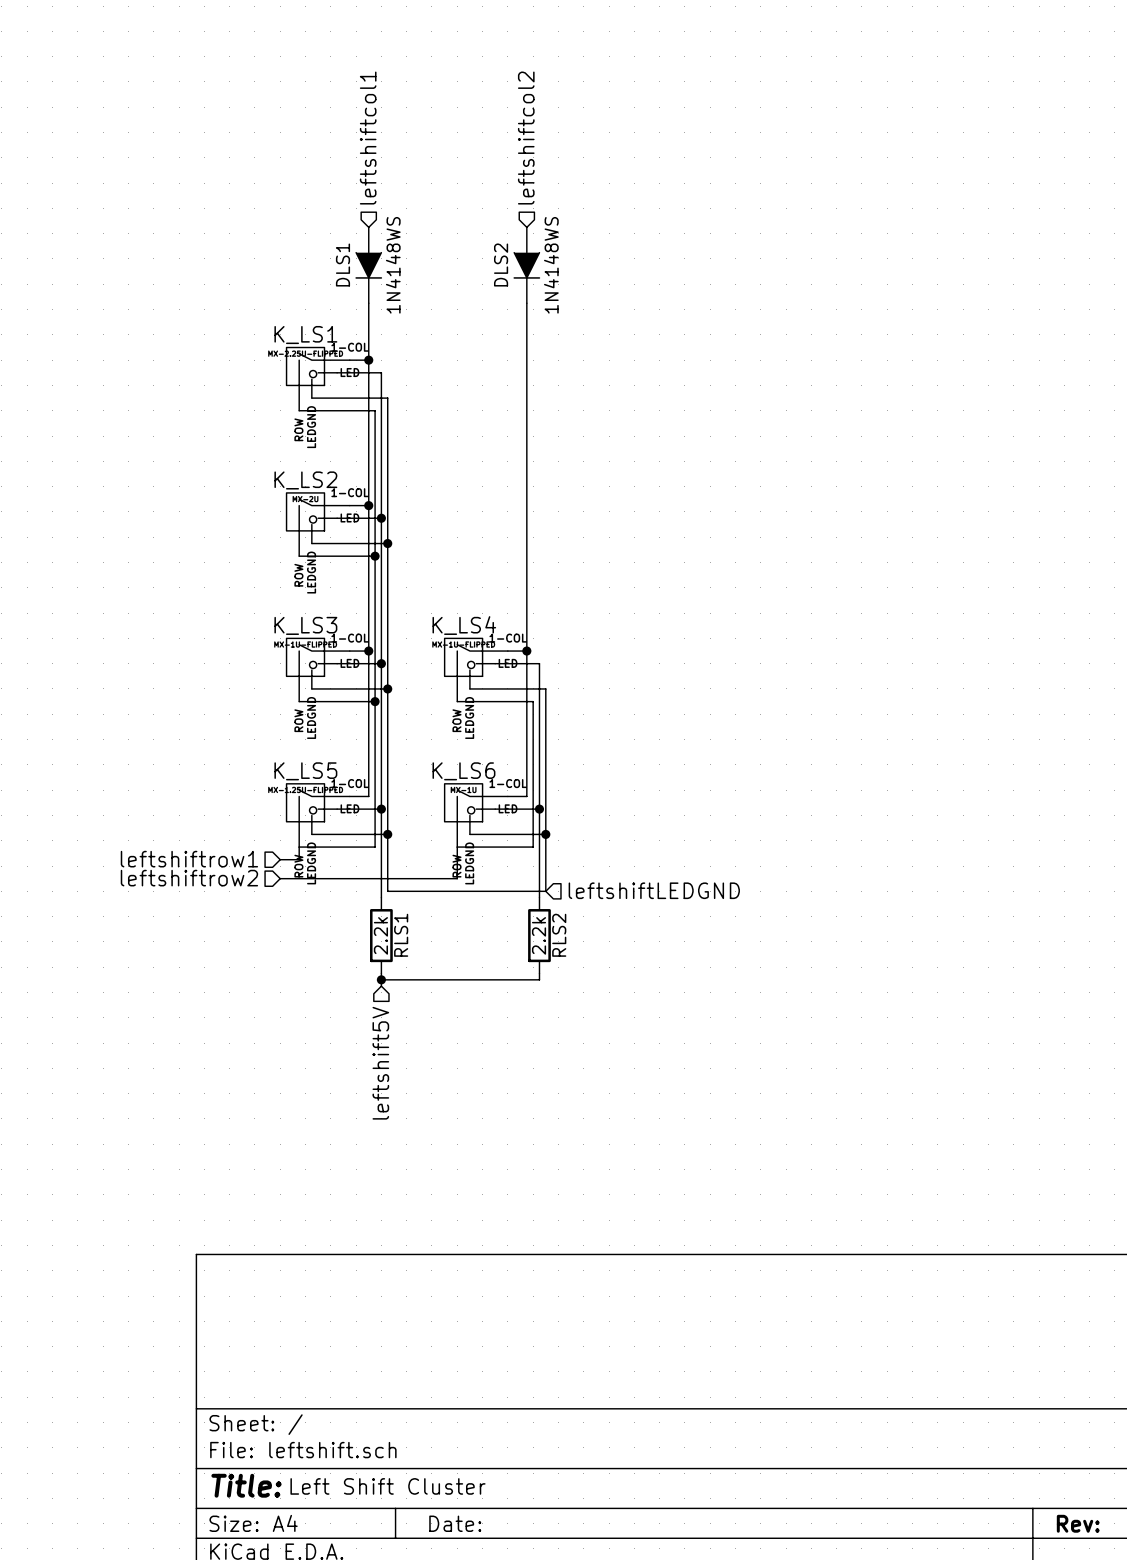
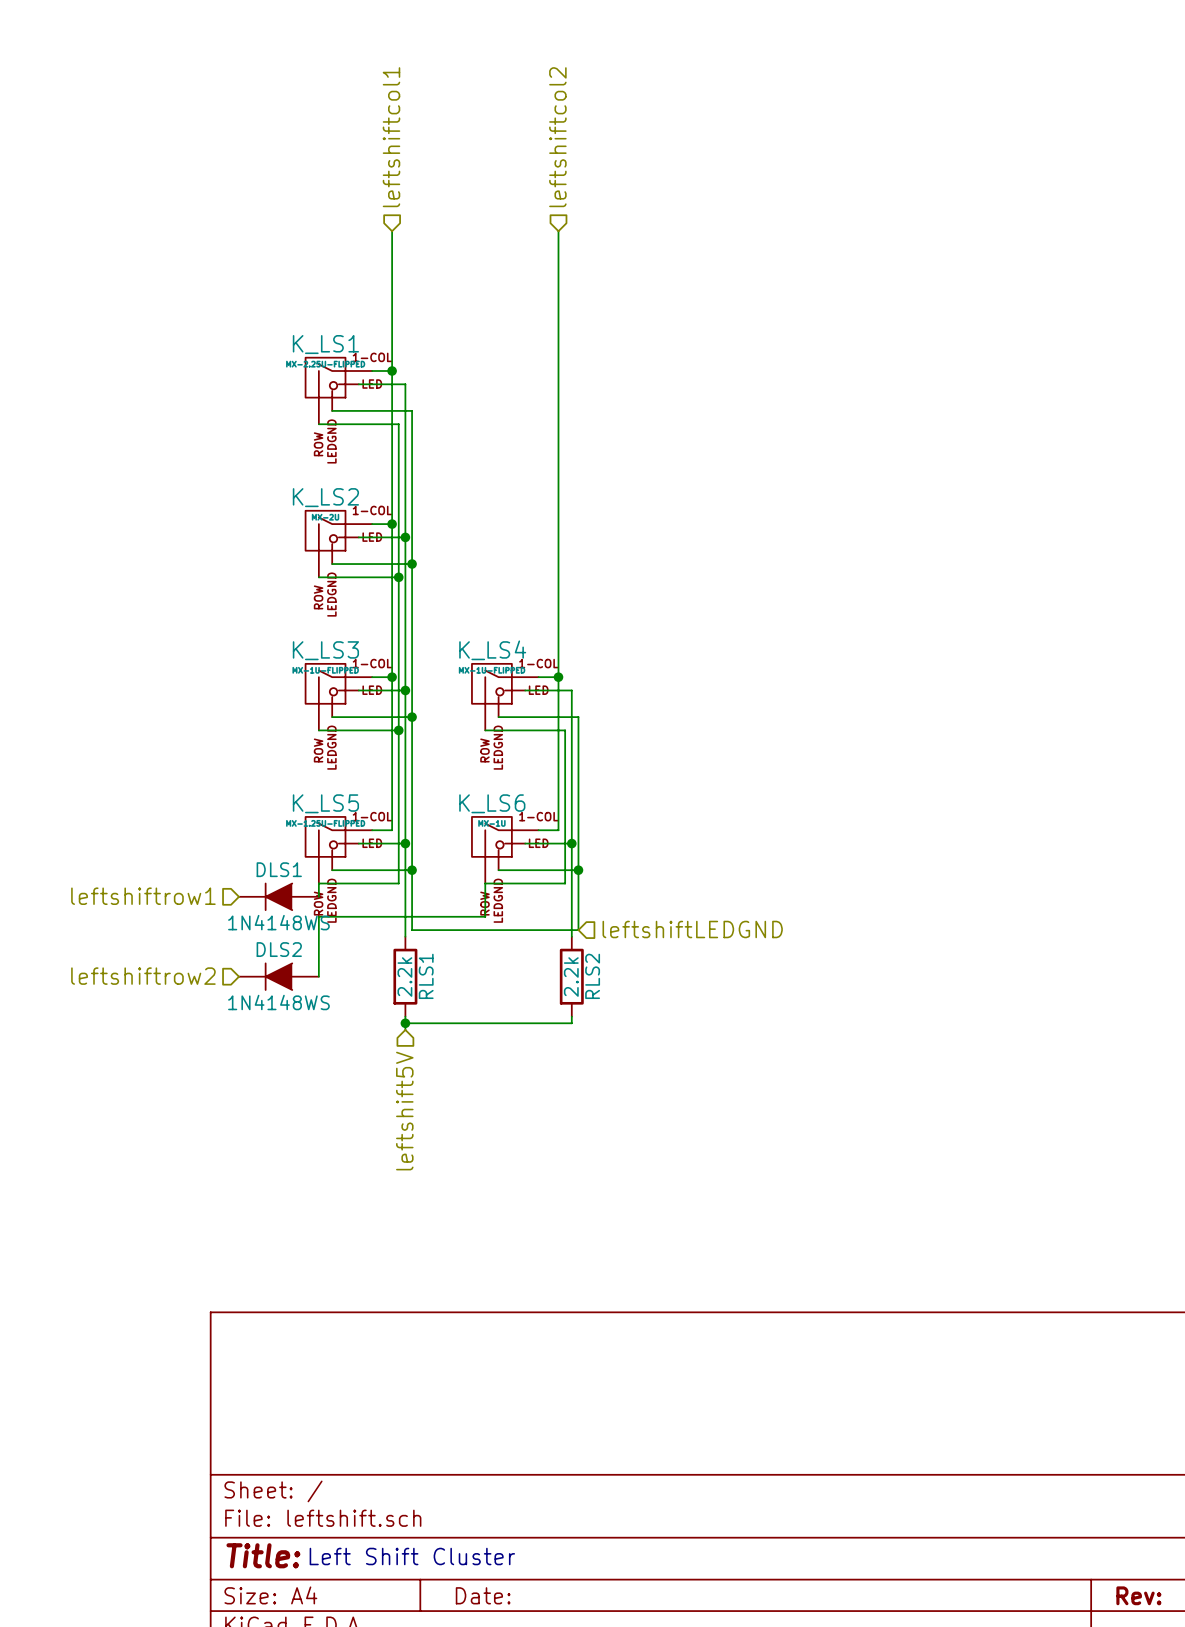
DLS1 rotation: 0° (368, 265) -> 90° clockwise (278, 896)
DLS1 position: (368, 265) -> (278, 896)
DLS2 rotation: 0° (526, 265) -> 90° clockwise (278, 976)
DLS2 position: (526, 265) -> (278, 976)
hierarchical label position: leftshiftrow1 (189, 859) -> leftshiftrow1 (143, 896)
hierarchical label position: leftshiftrow2 (189, 878) -> leftshiftrow2 (143, 976)
wire: (280, 878) (299, 878) -> (318, 976) (318, 916)

